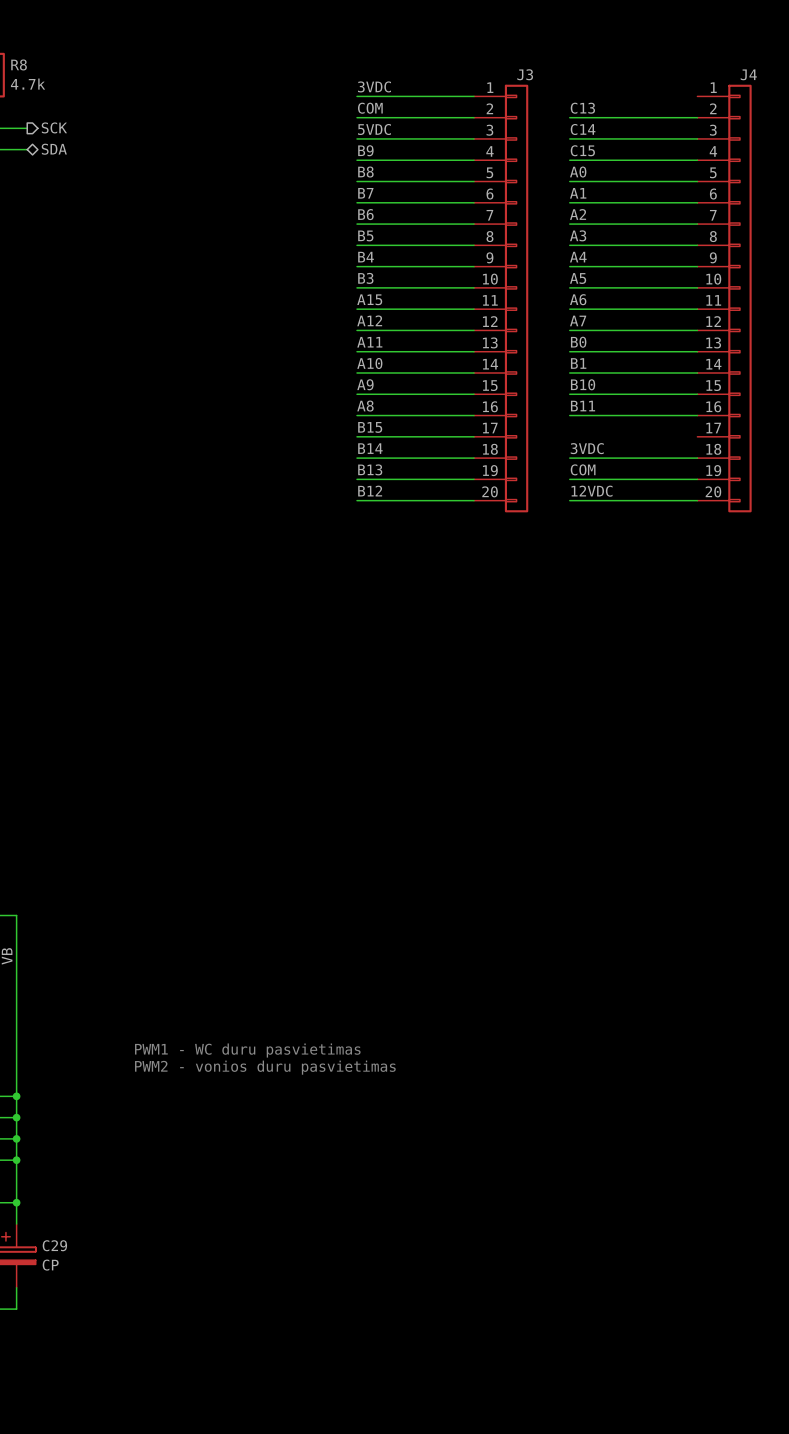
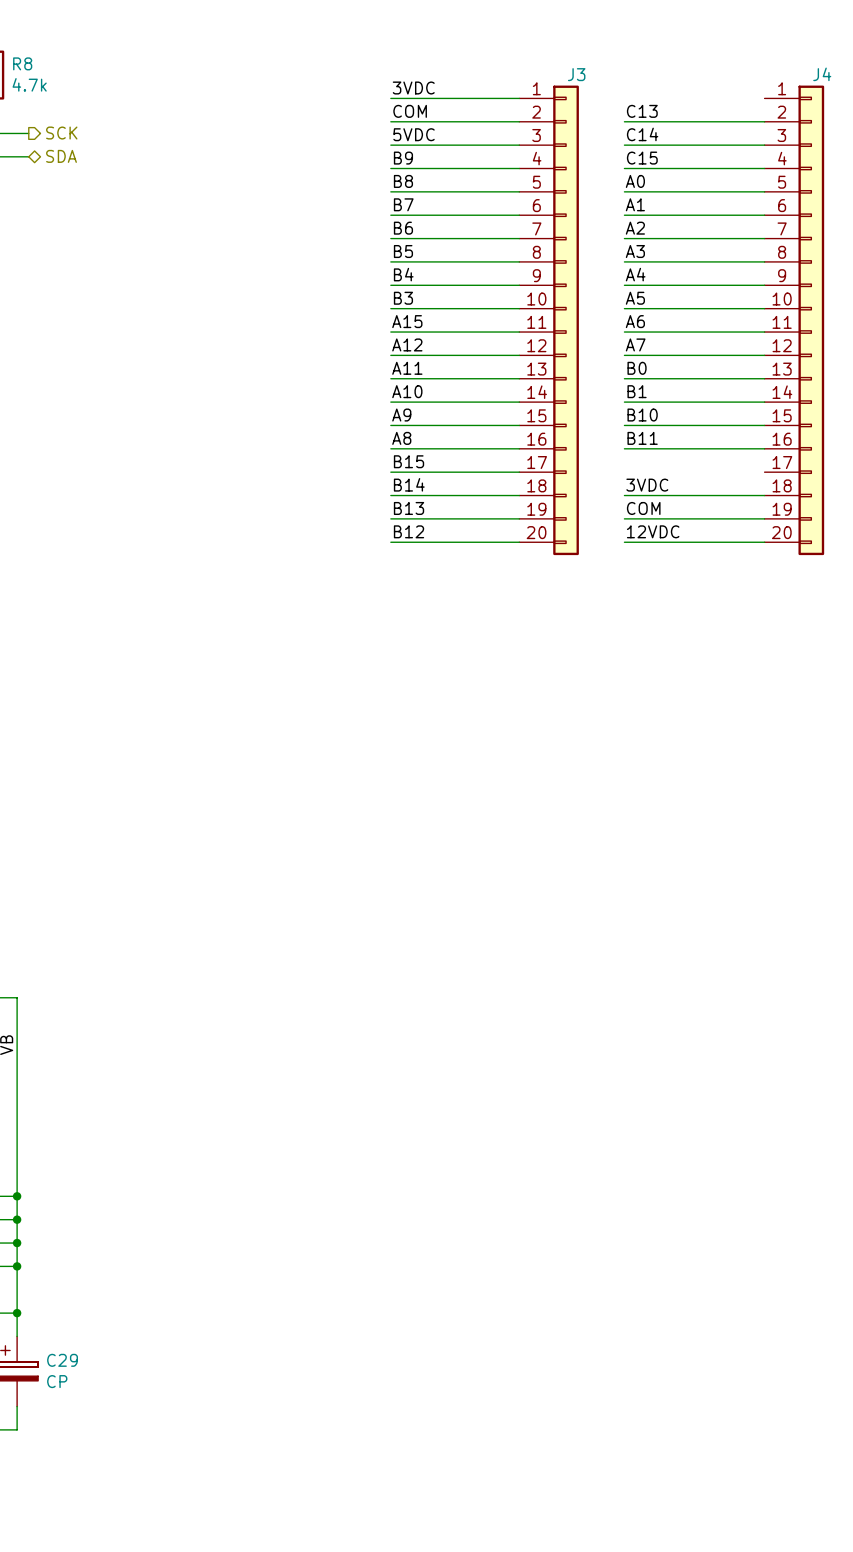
text: PWM1 - WC duru pasvietimas (247, 1050) -> none
text: PWM2 - vonios duru pasvietimas (265, 1067) -> none

